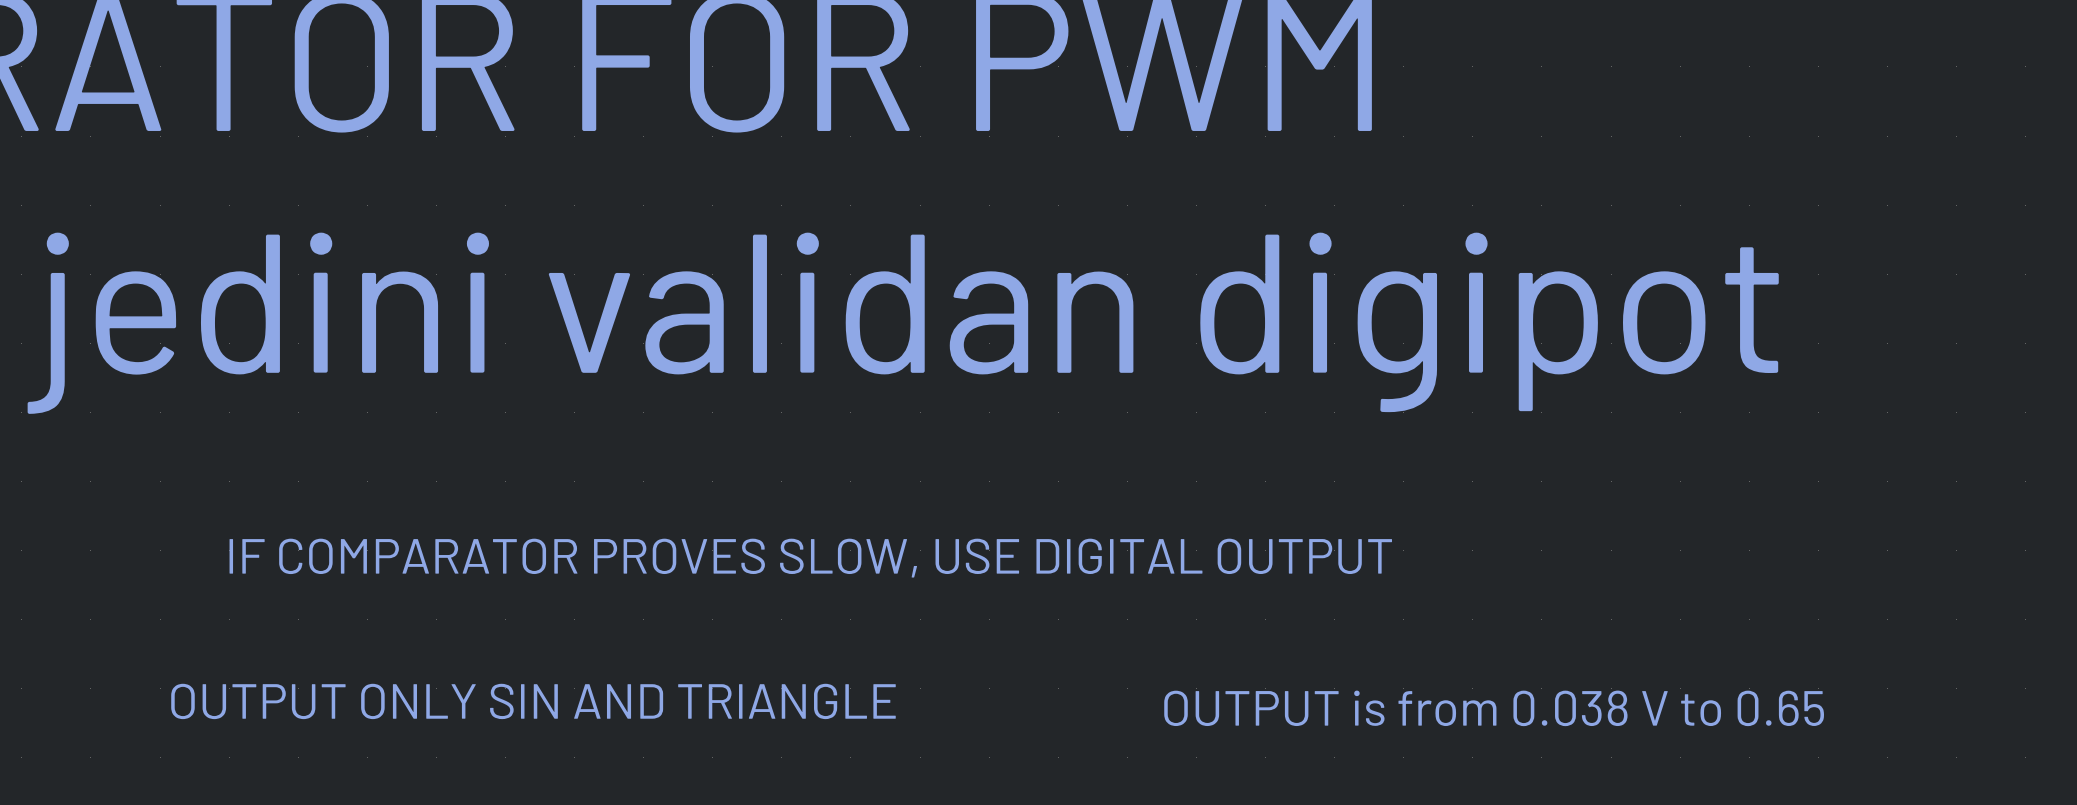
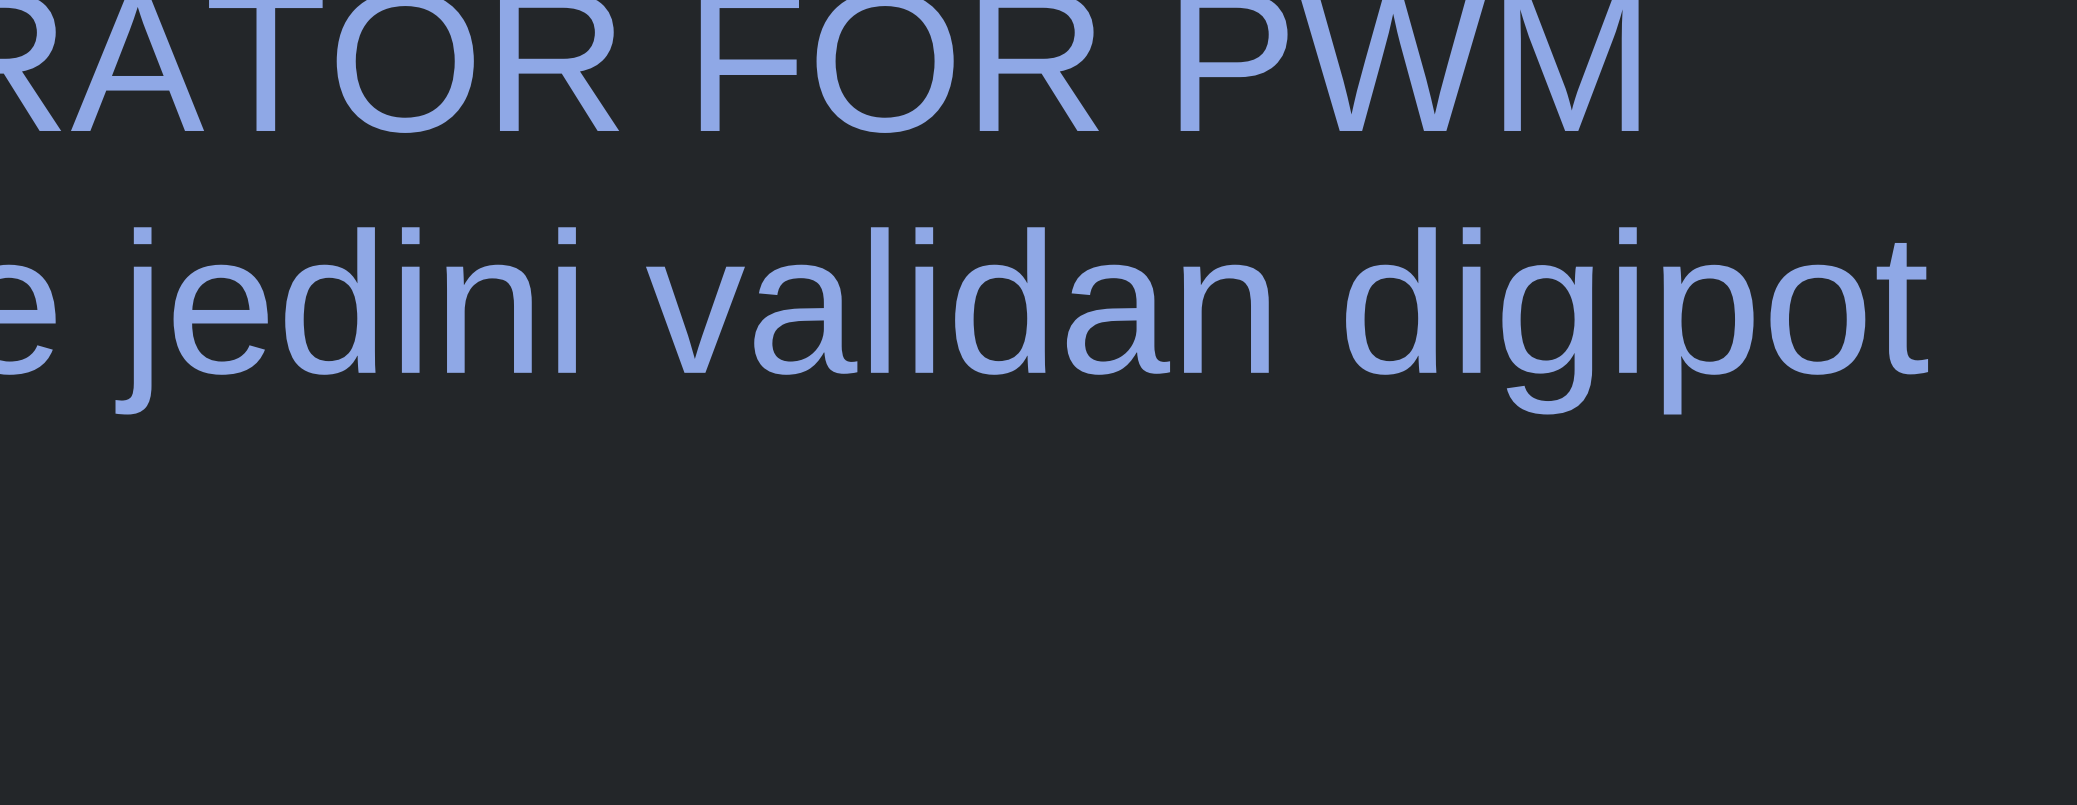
text: IF COMPARATOR PROVES SLOW, USE DIGITAL OUTPUT (810, 558) -> none
text: OUTPUT ONLY SIN AND TRIANGLE (533, 701) -> none
text: OUTPUT is from 0.038 V to 0.65 (1494, 708) -> none

